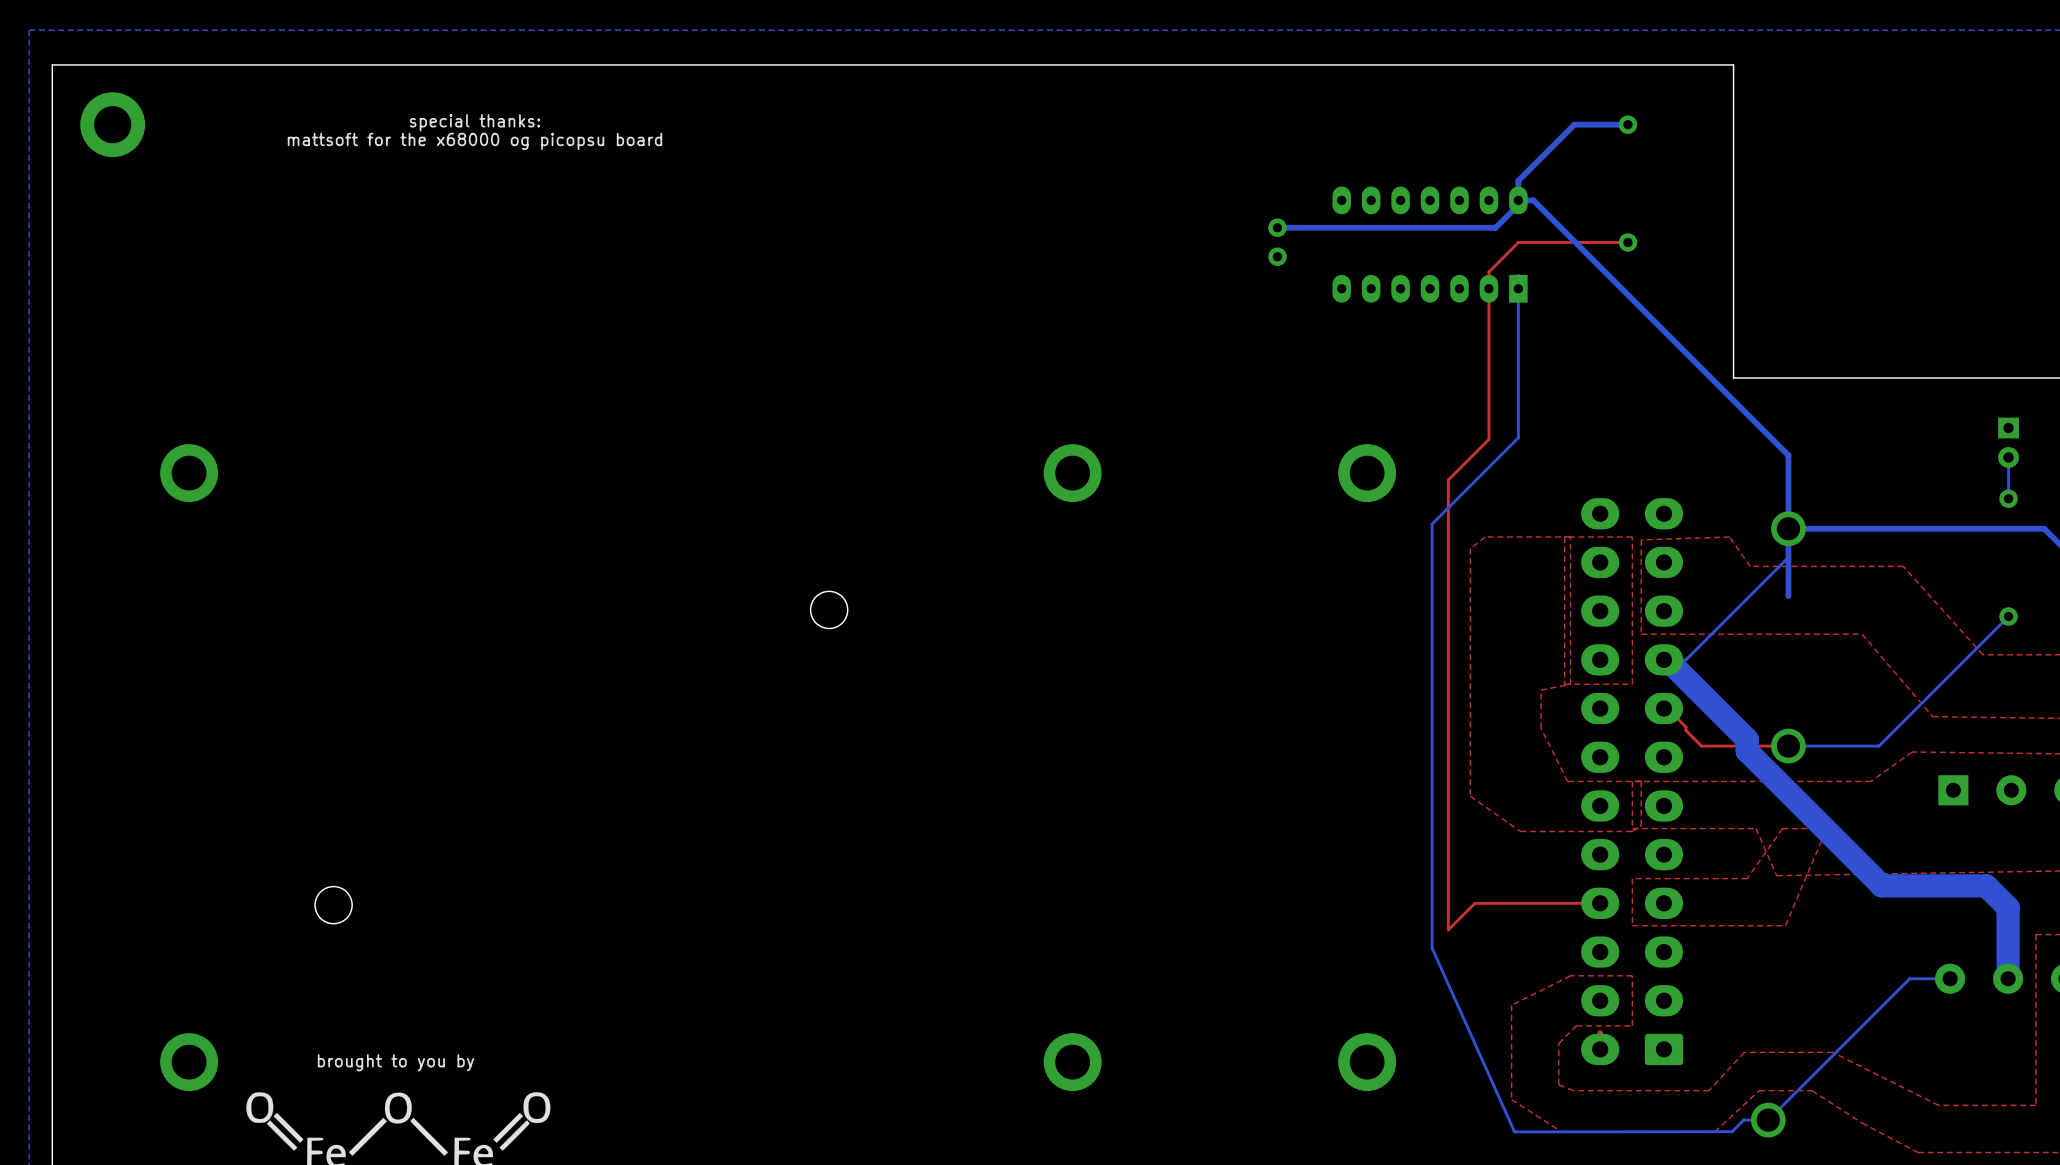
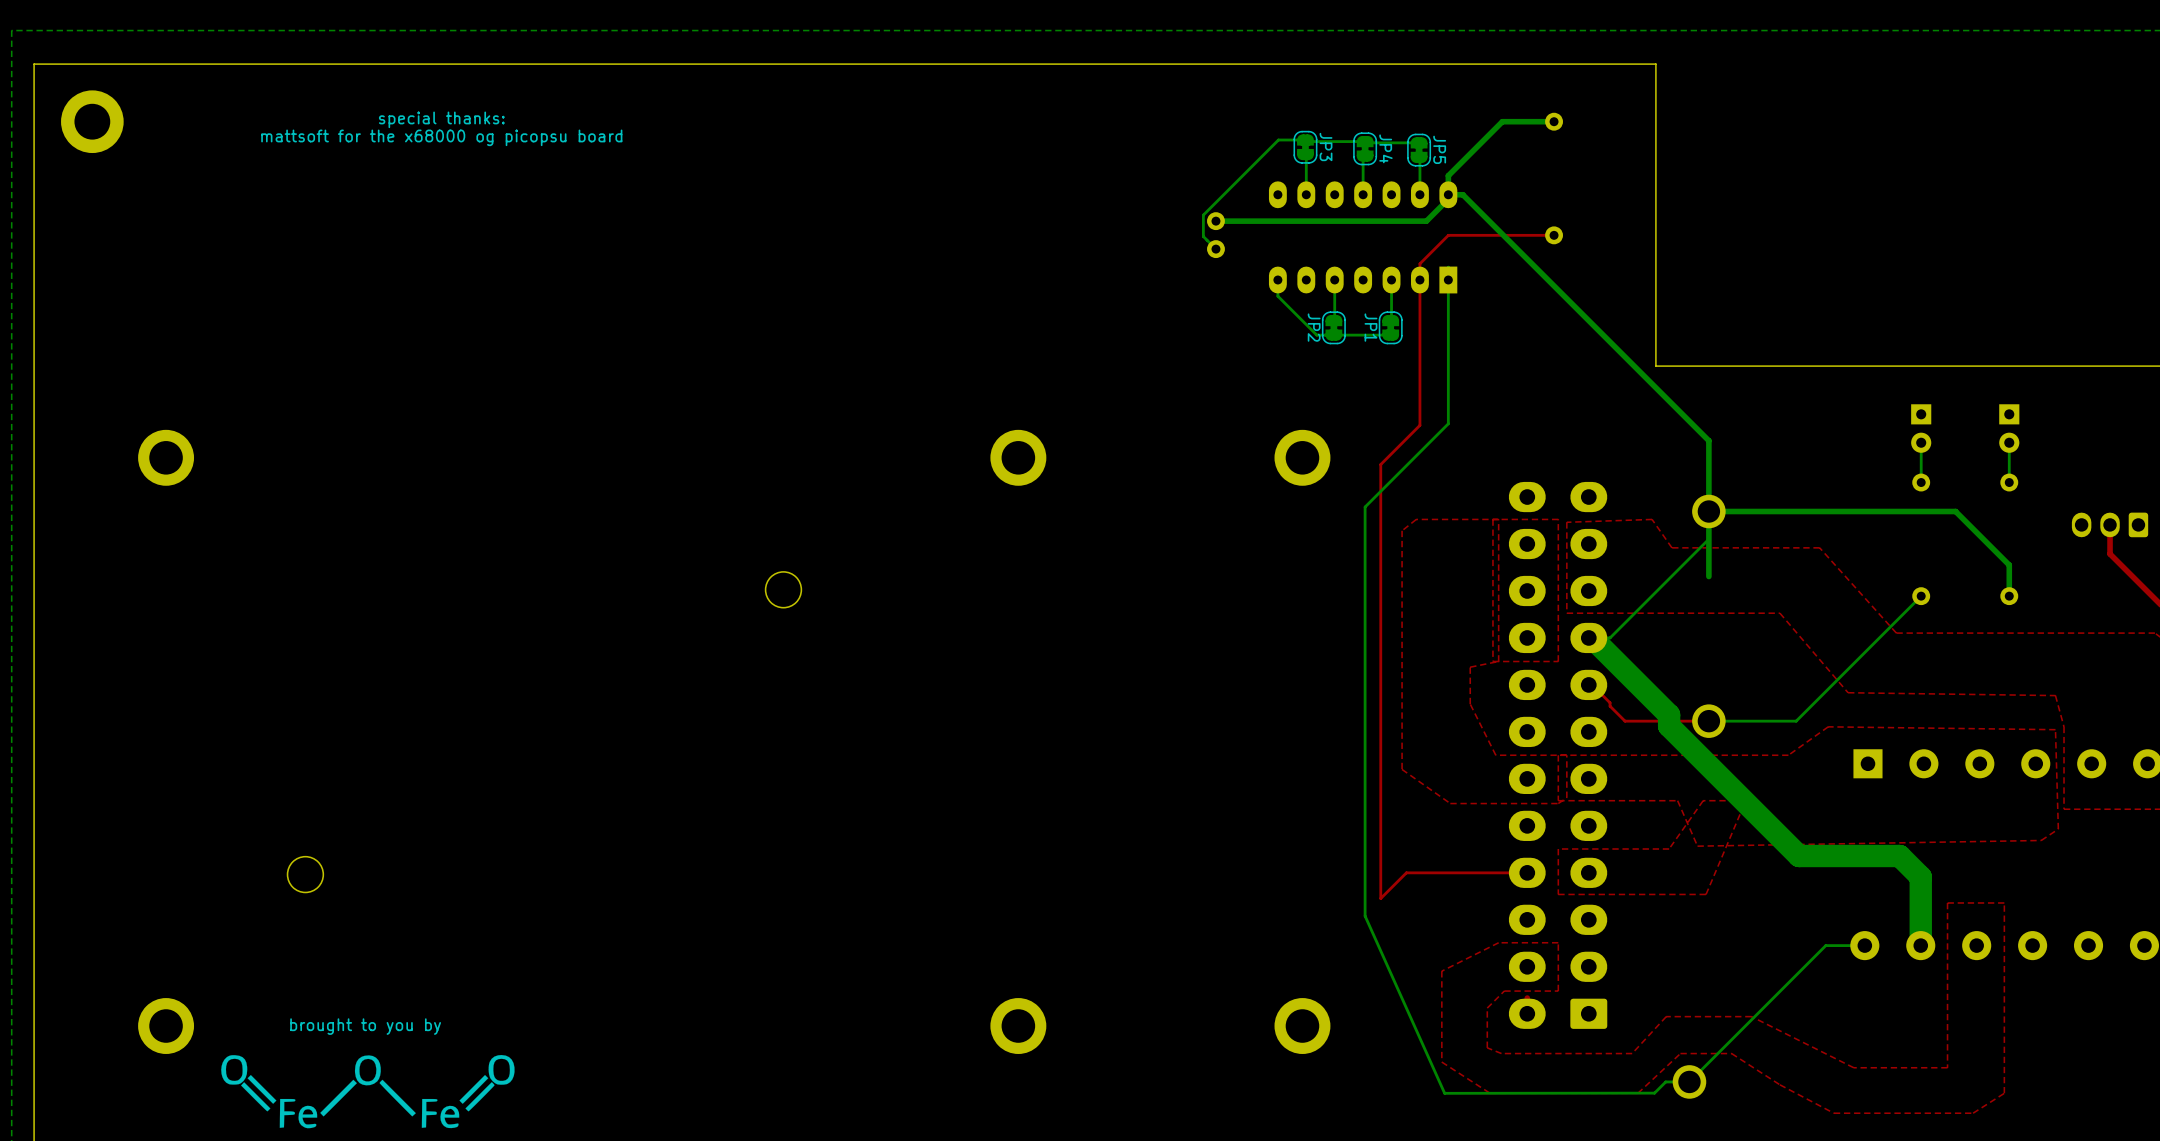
bottom track: none -> (1419, 142) (1278, 140) (1203, 215) (1203, 236) (1215, 249)
JP3: none -> (1305, 147)
JP4: none -> (1365, 148)
JP5: none -> (1419, 150)
bottom track: none -> (1305, 154) (1306, 194)
bottom track: none -> (1365, 156) (1363, 158) (1363, 194)
bottom track: none -> (1419, 157) (1419, 194)
bottom track: none -> (1277, 279) (1277, 296) (1316, 335) (1390, 335)
bottom track: none -> (1334, 279) (1333, 320)
bottom track: none -> (1391, 279) (1390, 320)
JP2: none -> (1333, 327)
JP1: none -> (1390, 327)

